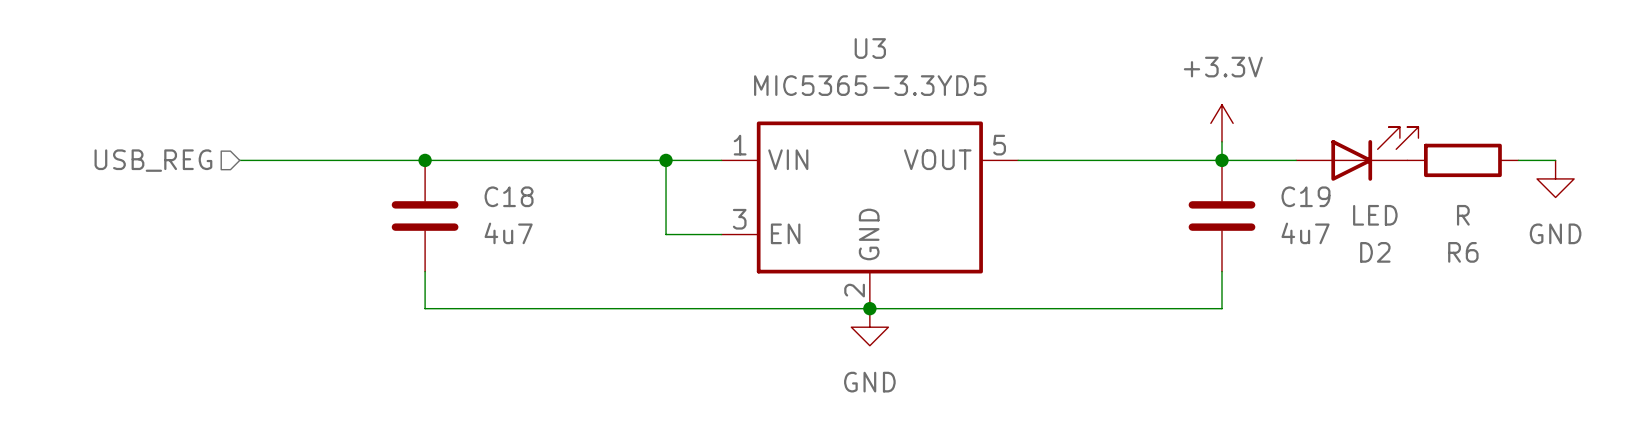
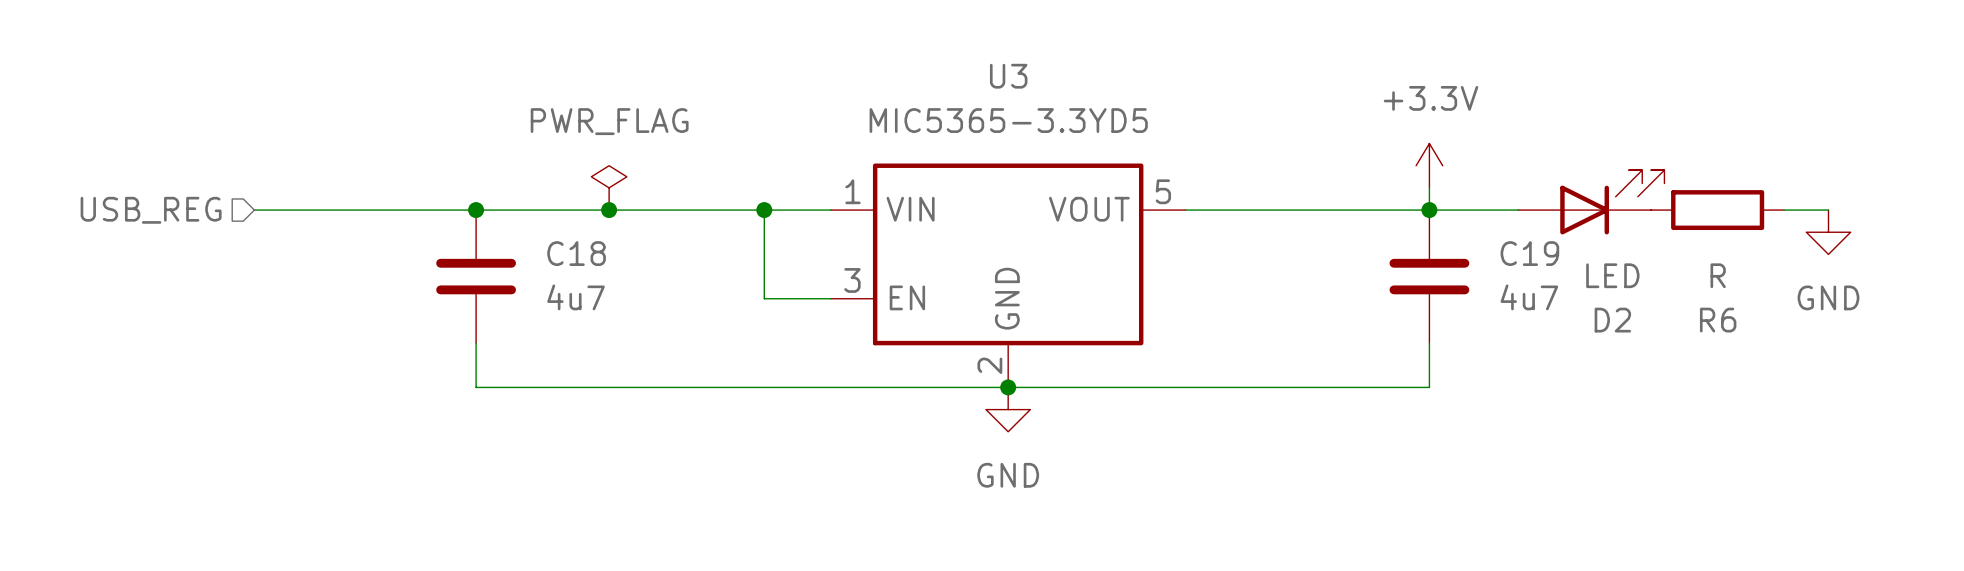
power symbol: none -> PWR_FLAG (609, 187)
junction: none -> (609, 210)

